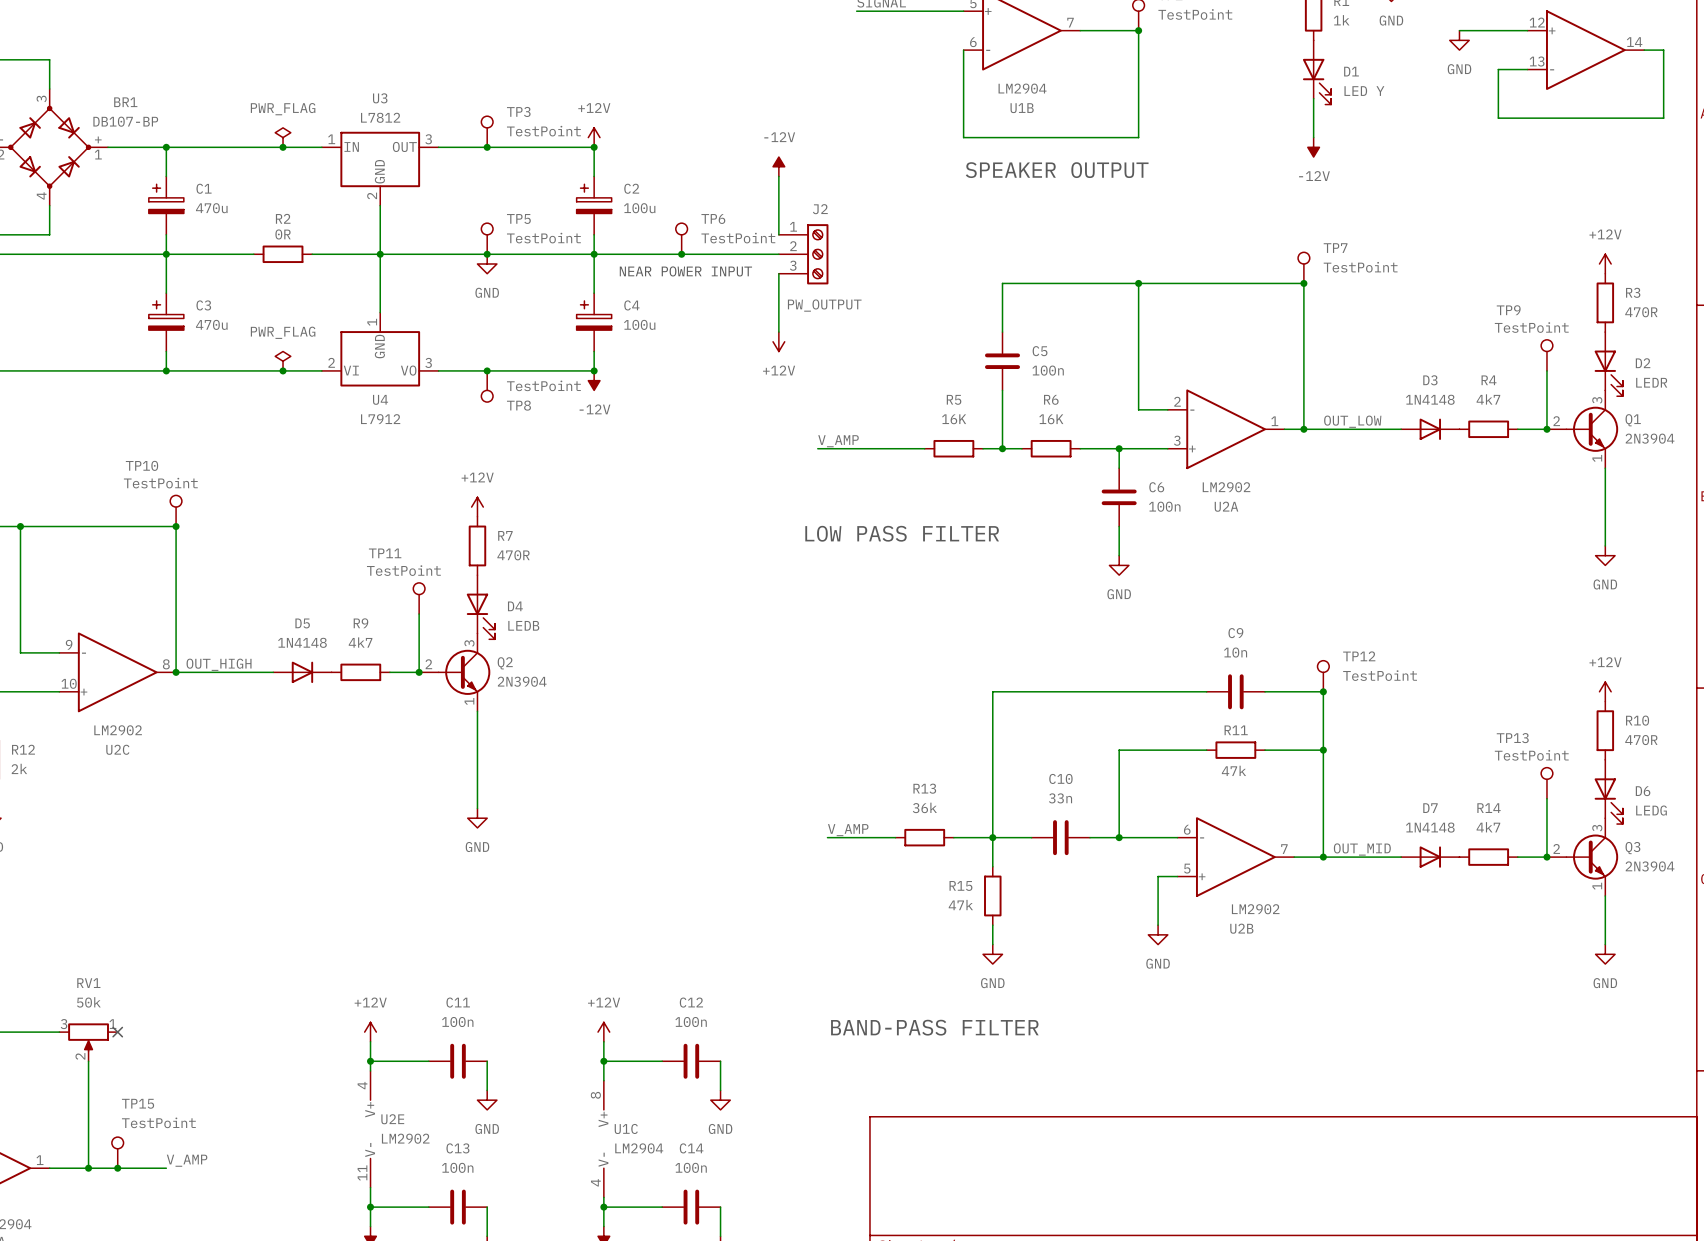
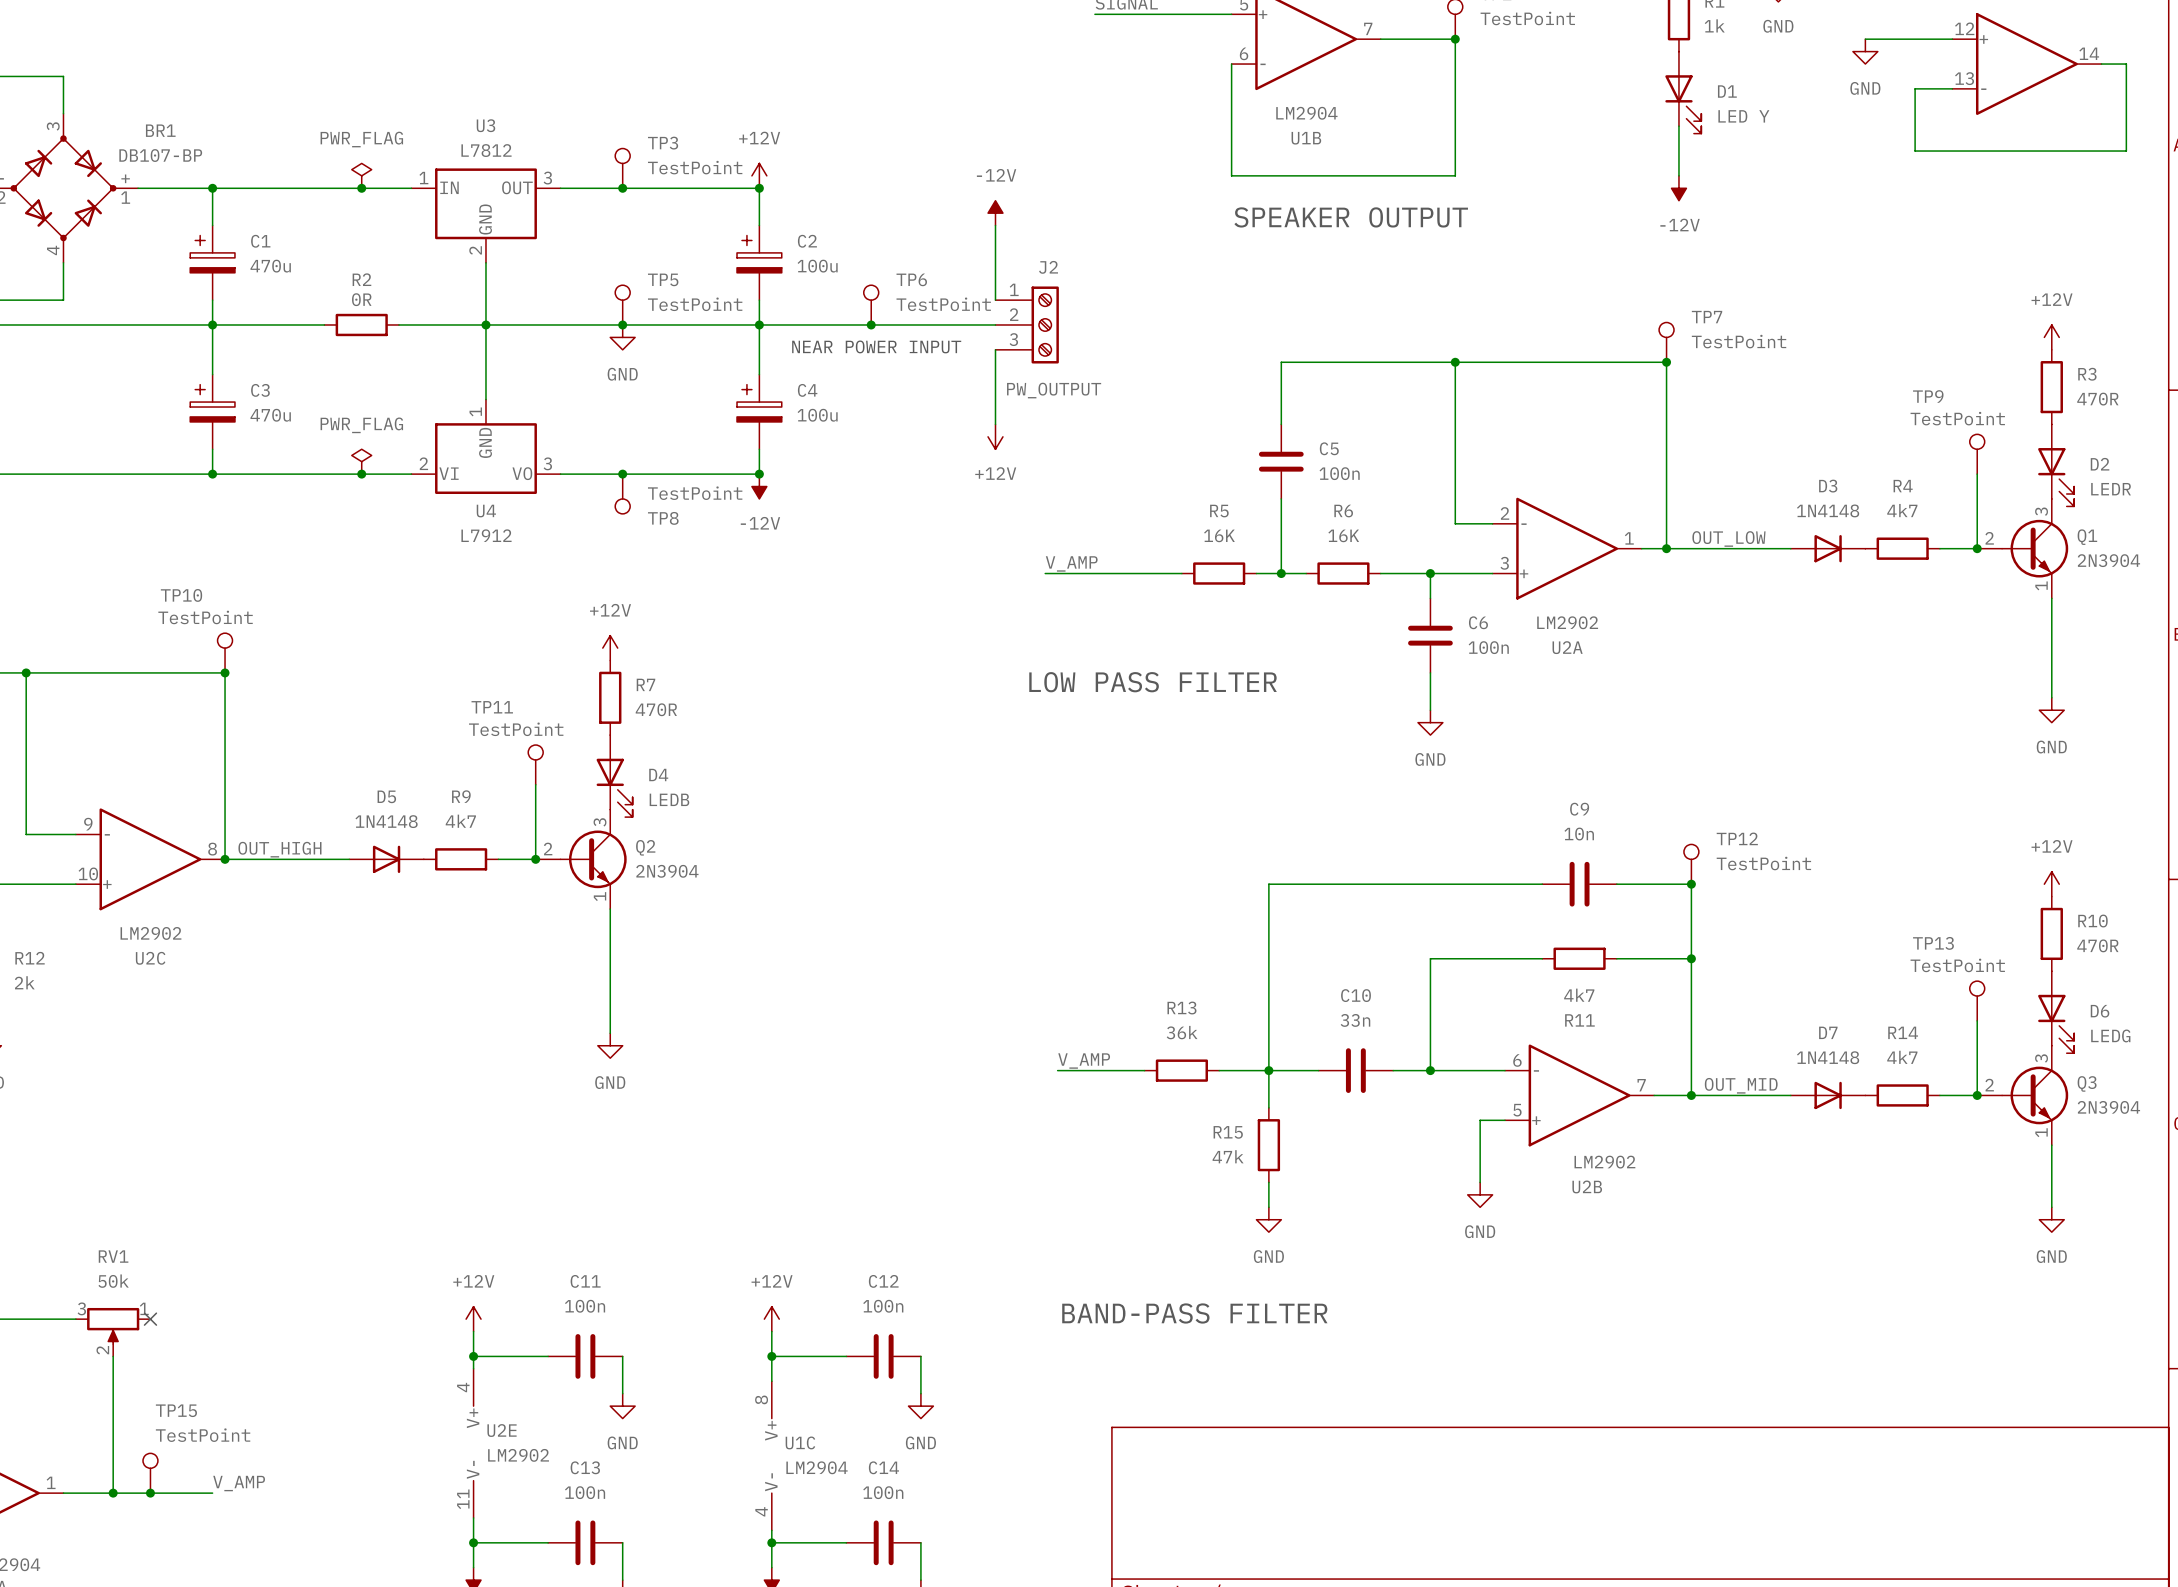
R11 name position: R11 (1236, 730) -> R11 (1579, 1020)
R11 value: 47k (1233, 770) -> 4k7 (1579, 995)

